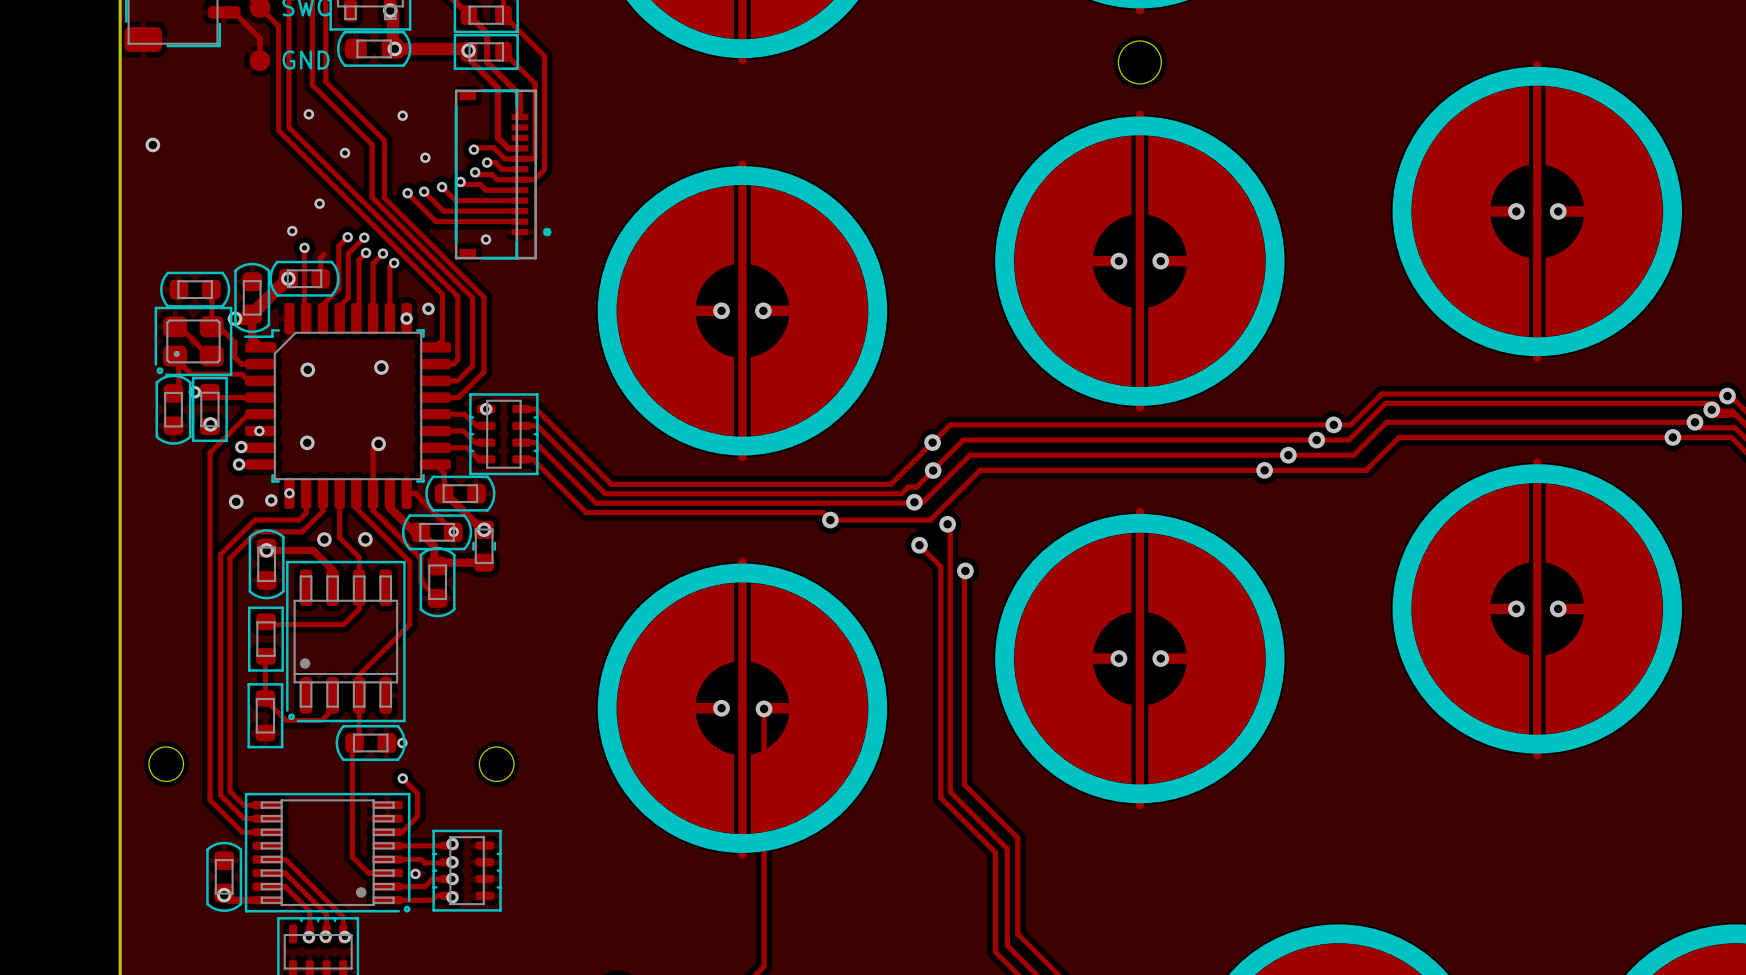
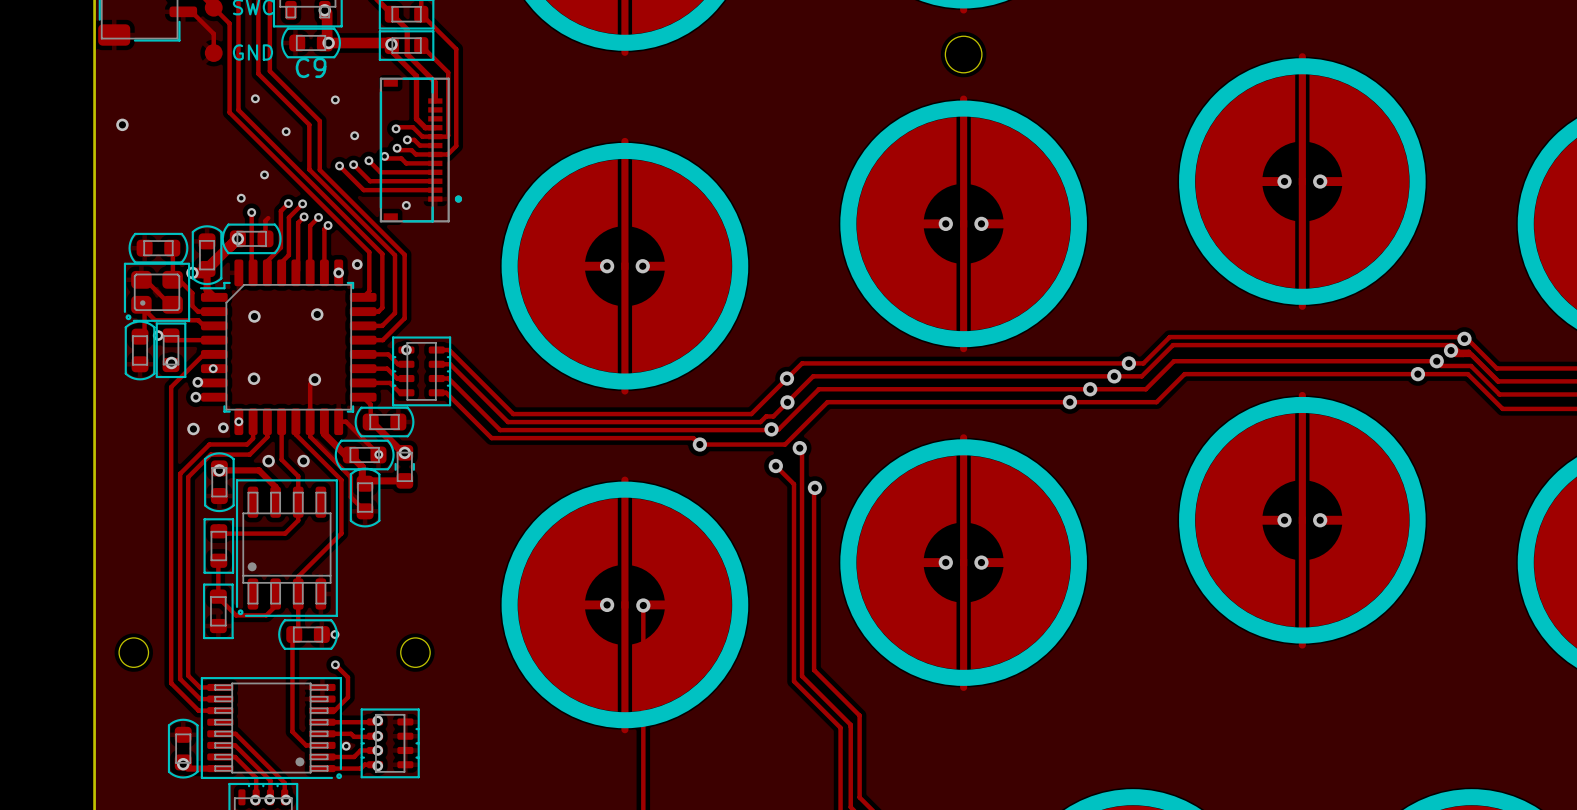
part: (374, 48) -> none
C9: none -> (311, 42)

